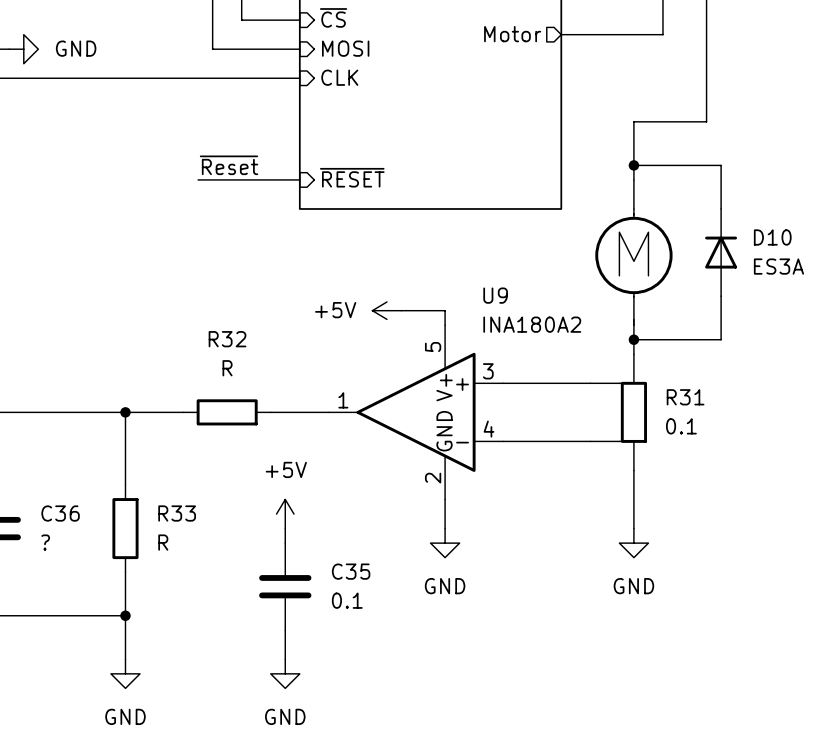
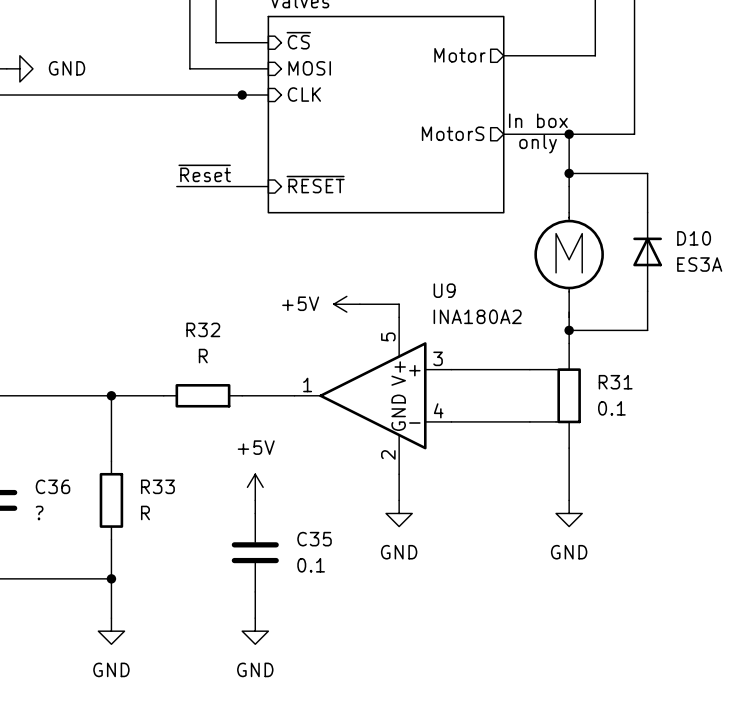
junction: none -> (242, 95)
text: none -> In box (538, 120)
sheet pin: none -> MotorS (453, 133)
wire: none -> (503, 134) (569, 134)
junction: none -> (569, 134)
text: none -> only (538, 144)

